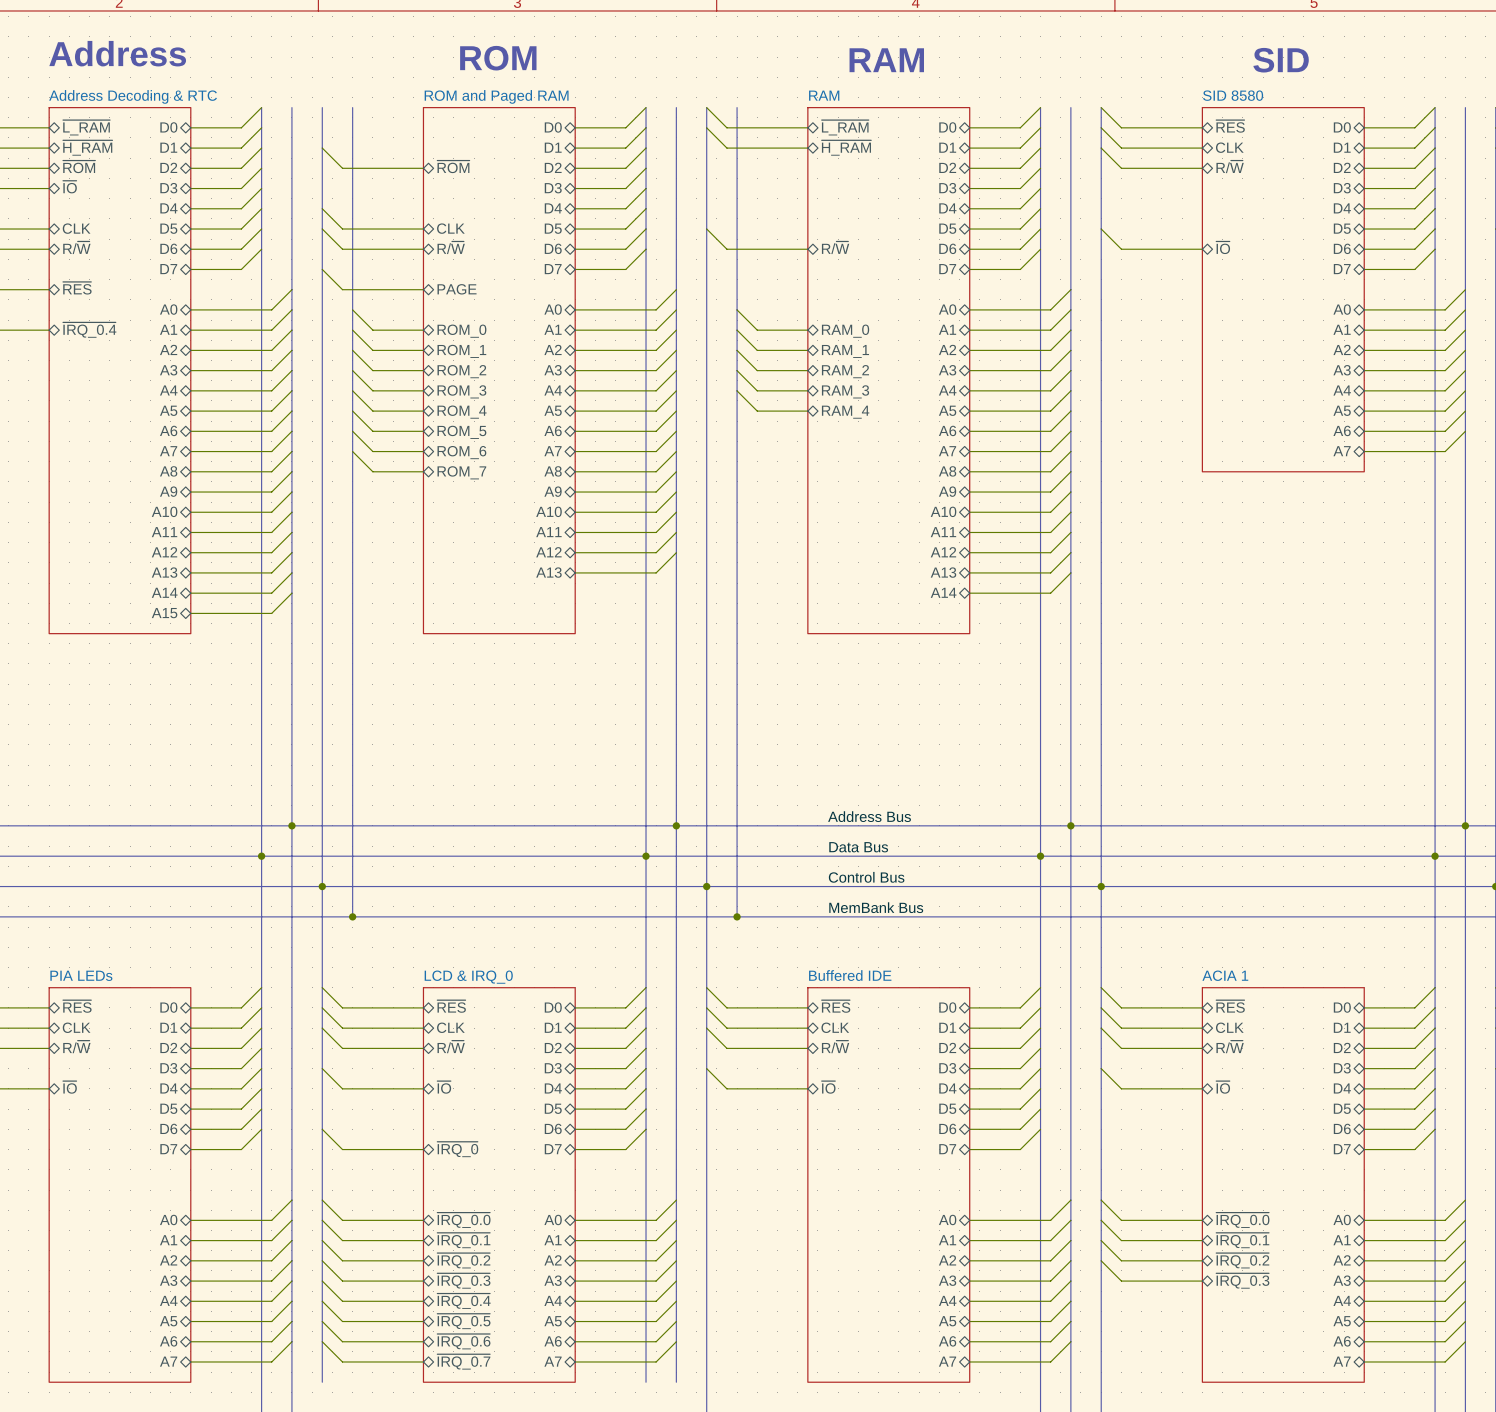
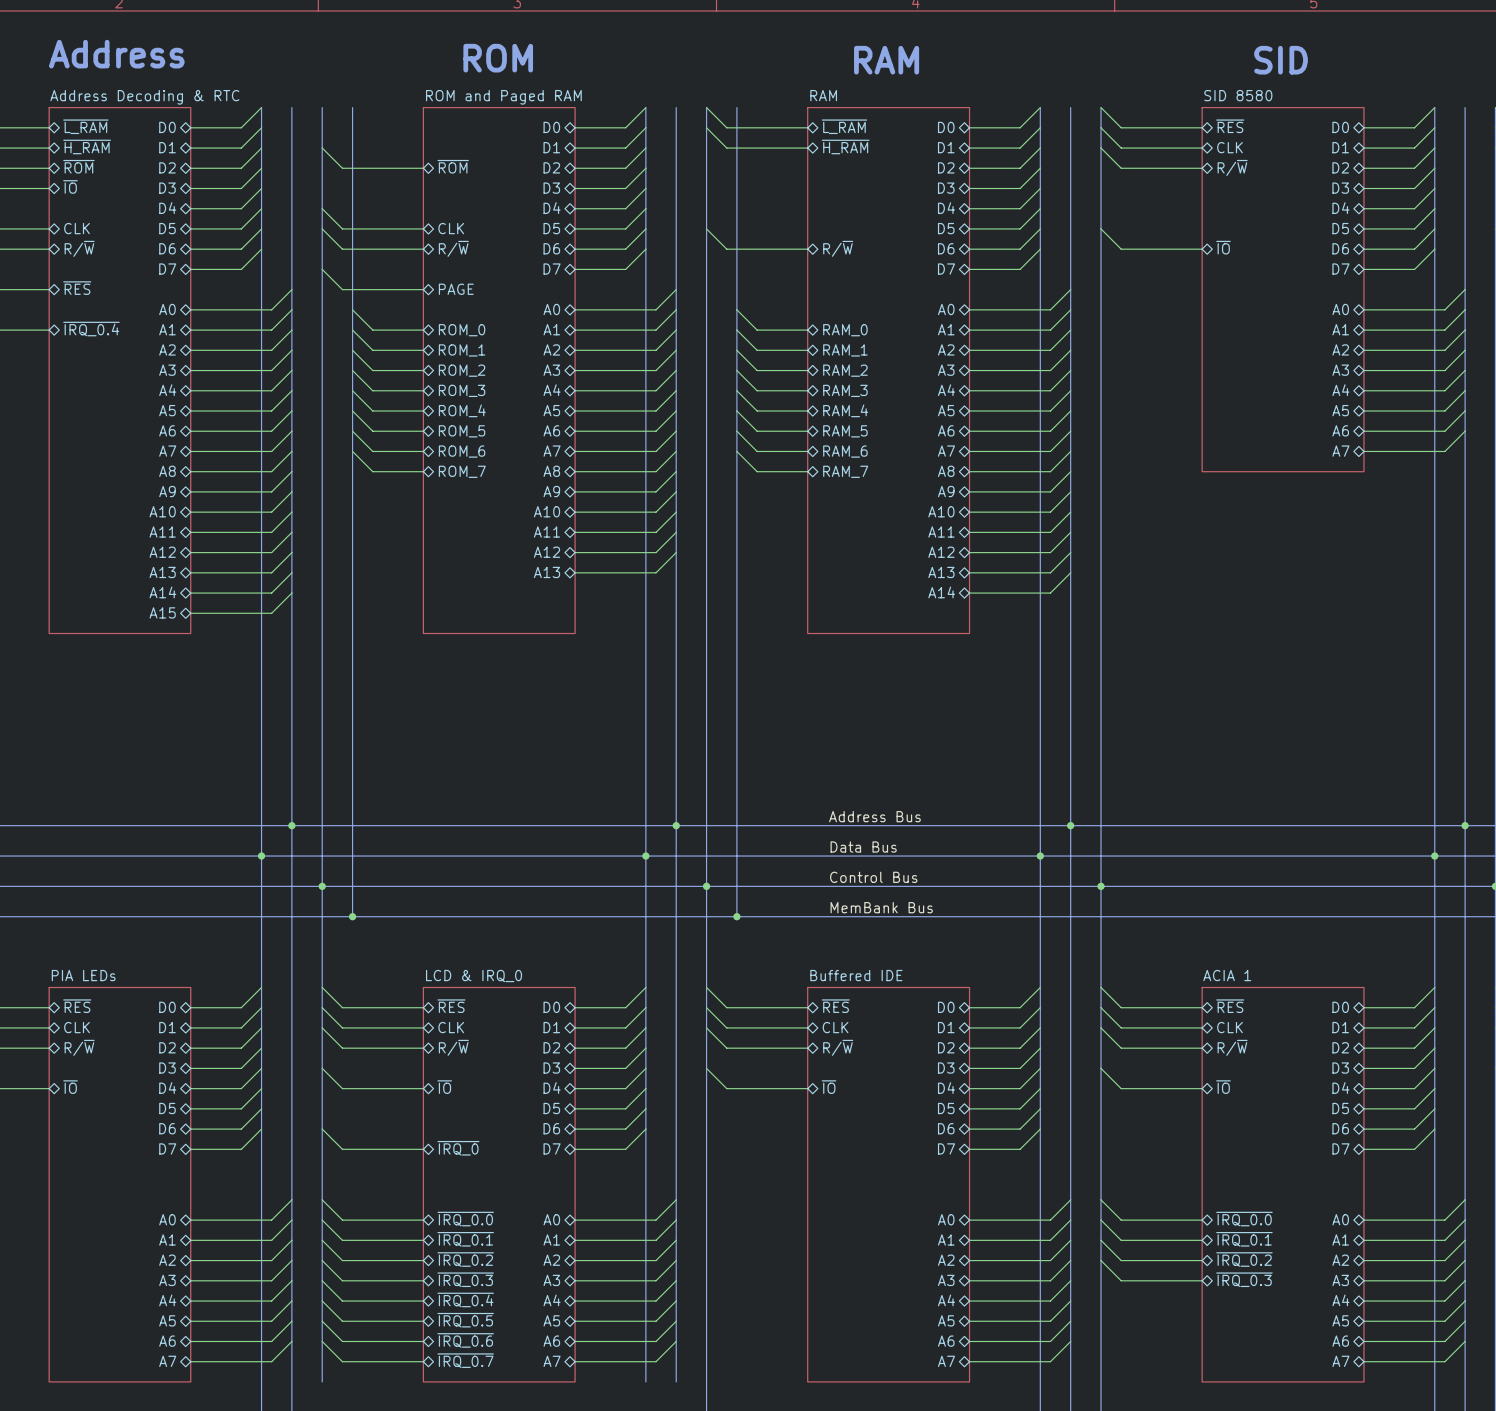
wire: none -> (736, 411) (757, 431) (807, 431)
wire: none -> (736, 431) (757, 451) (807, 451)
sheet pin: none -> RAM_5 (845, 431)
wire: none -> (736, 451) (757, 471) (807, 471)
sheet pin: none -> RAM_6 (845, 451)
sheet pin: none -> RAM_7 (845, 471)

